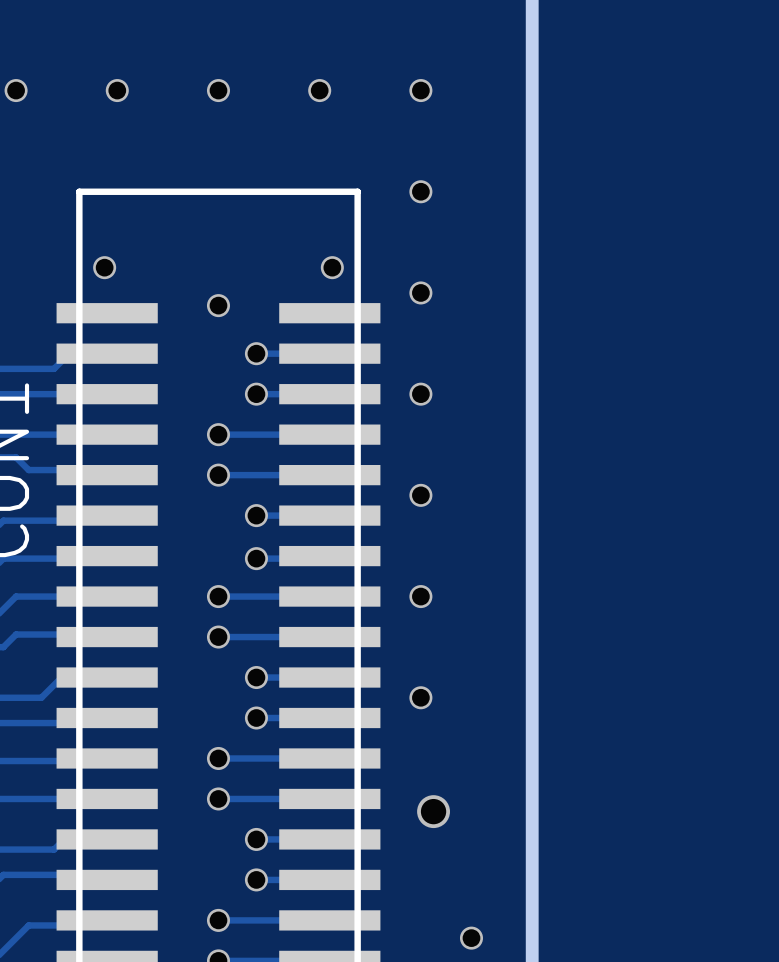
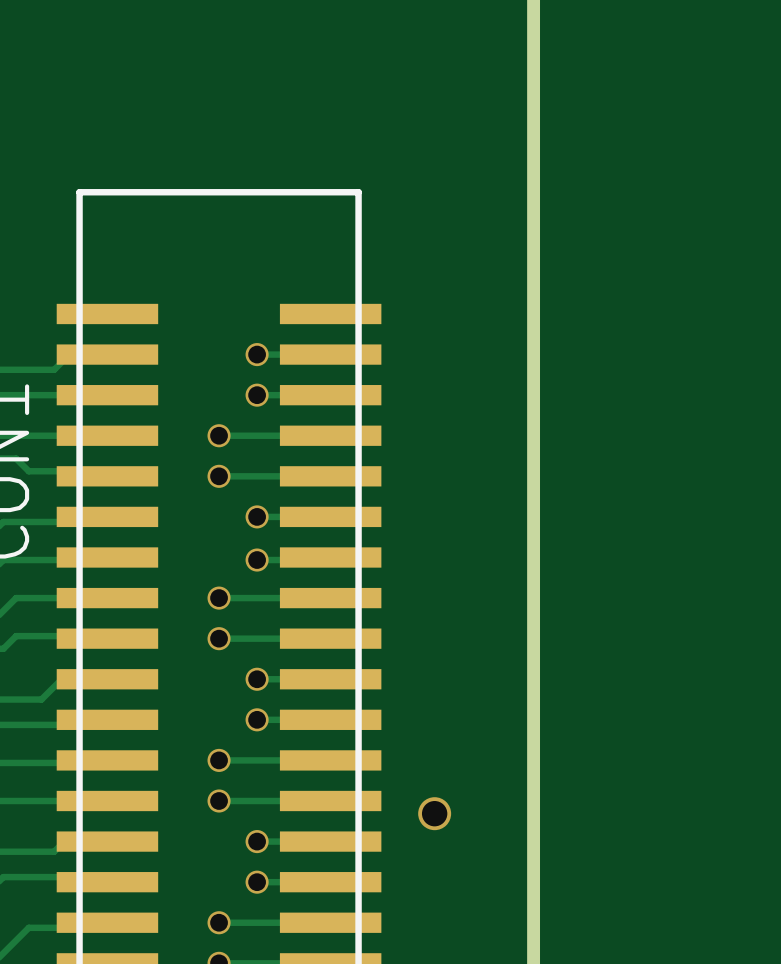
via: (16, 90) -> none
via: (117, 90) -> none
via: (218, 90) -> none
via: (319, 90) -> none
via: (420, 90) -> none
via: (420, 191) -> none
via: (104, 267) -> none
via: (332, 267) -> none
via: (420, 292) -> none
via: (218, 305) -> none
via: (420, 394) -> none
via: (420, 495) -> none
via: (420, 596) -> none
via: (420, 697) -> none
via: (471, 938) -> none

